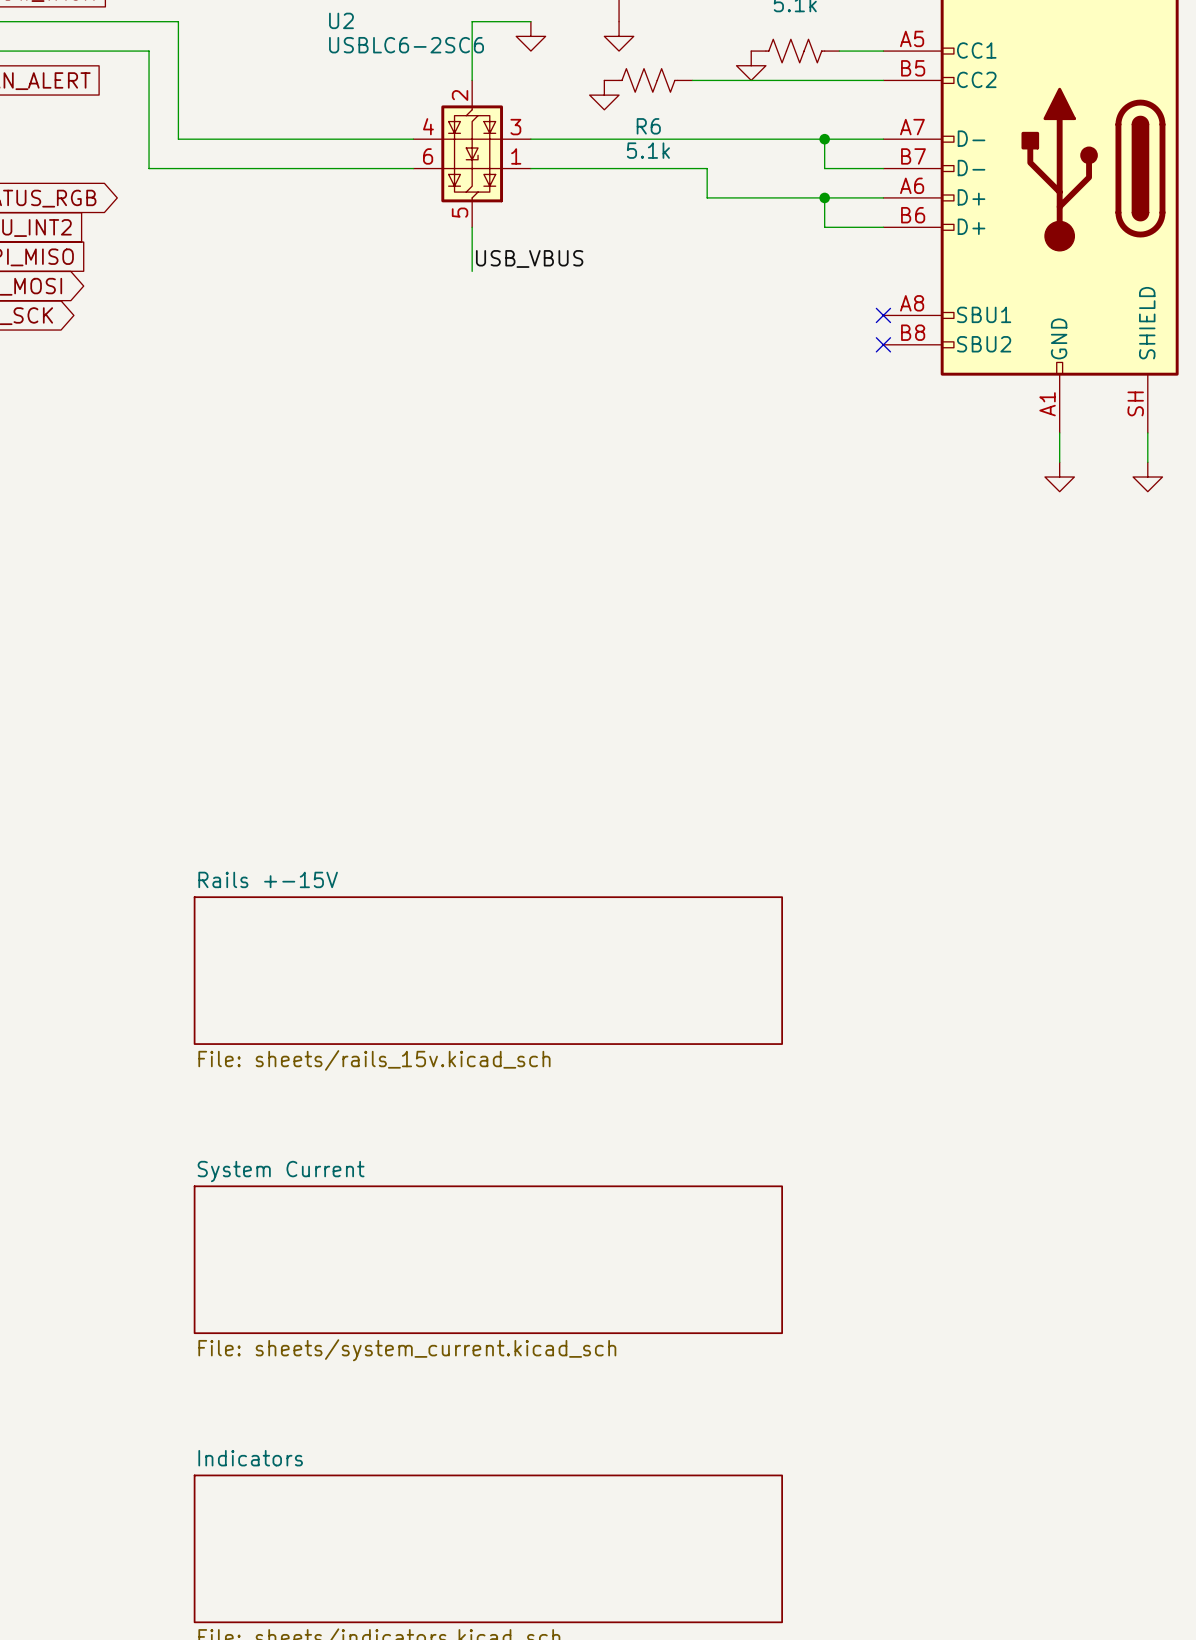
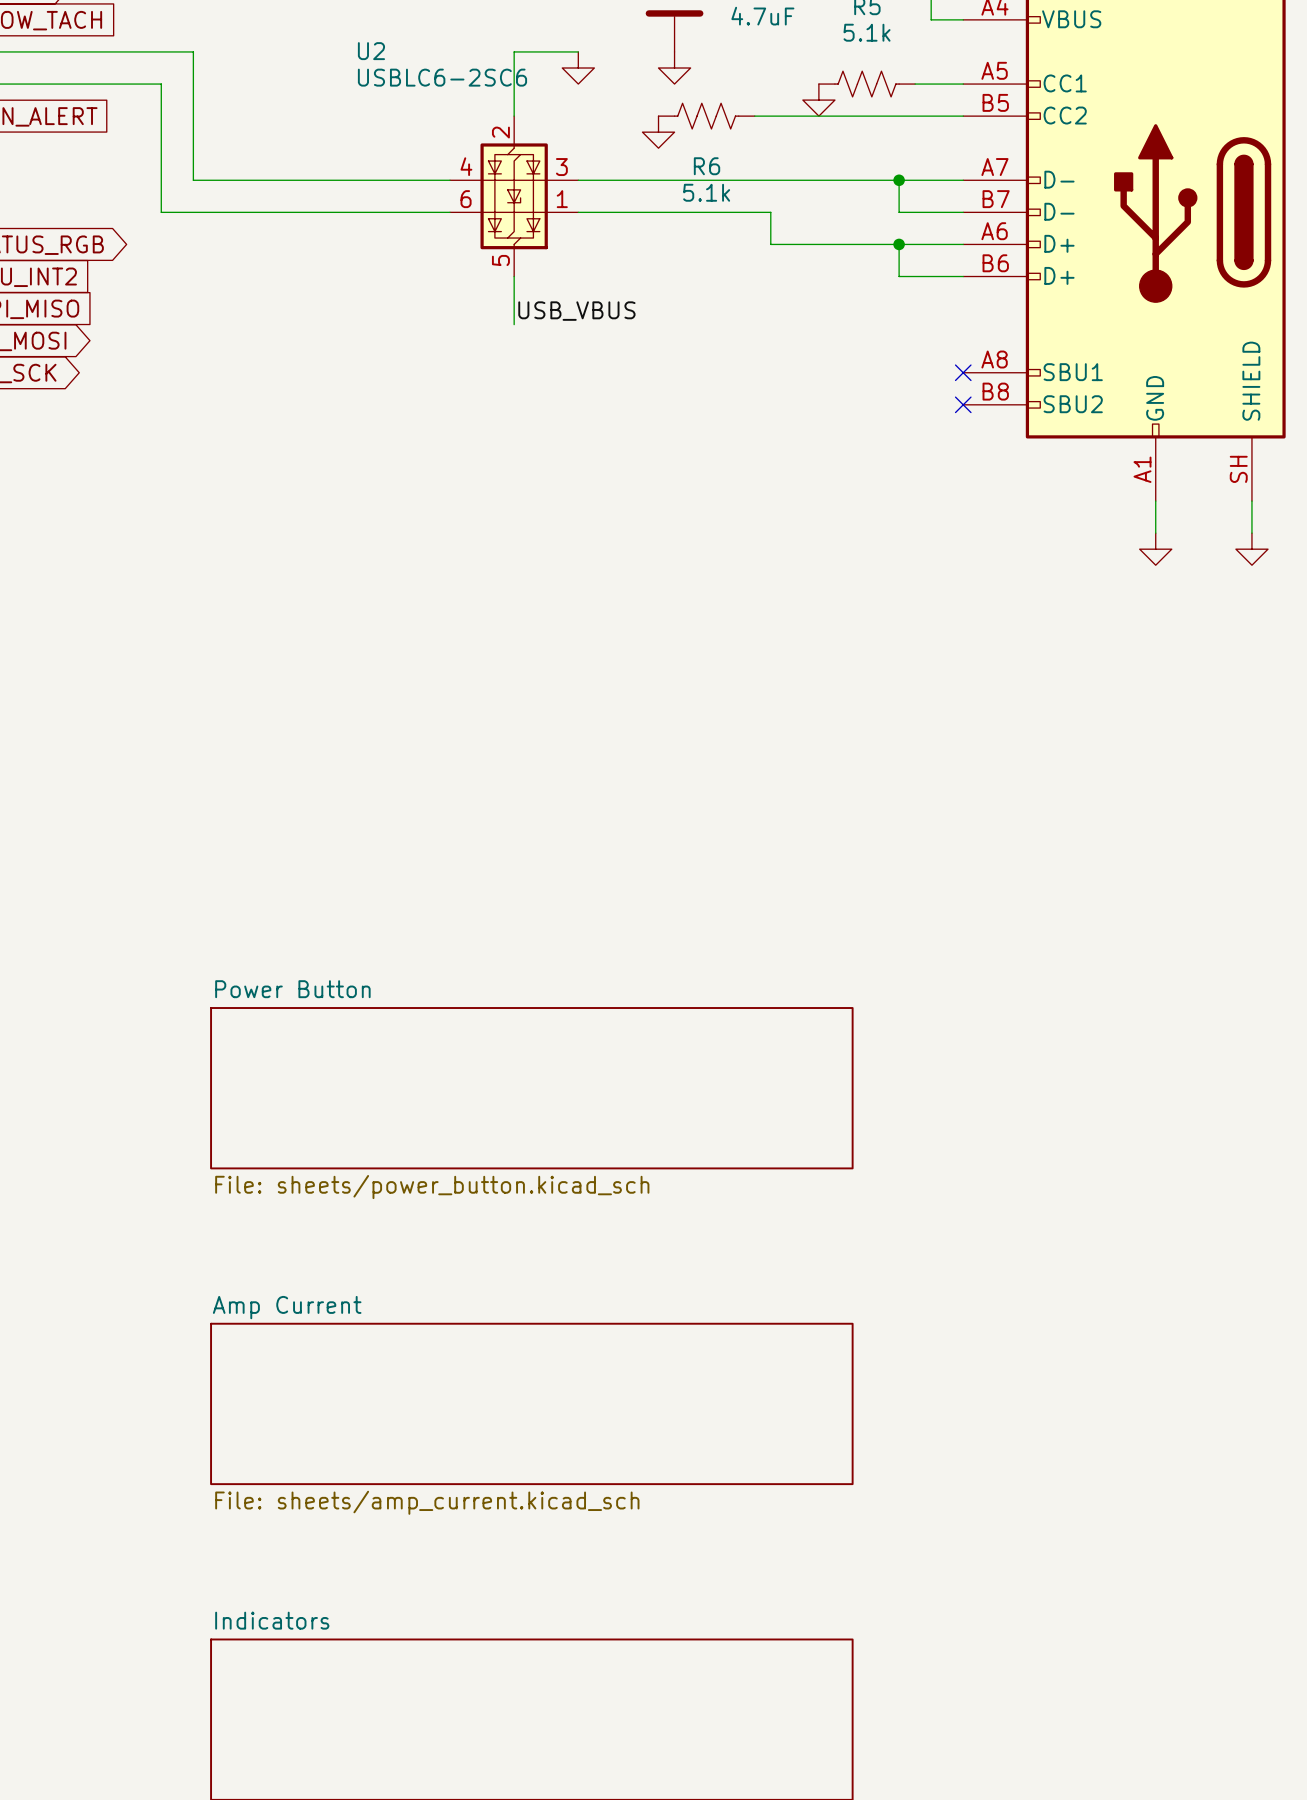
sheet Rails +-15V name: Rails +-15V (268, 879) -> Power Button (292, 989)
sheet Rails +-15V value: File: sheets/rails_15v.kicad_sch (374, 1060) -> File: sheets/power_button.kicad_sch (432, 1187)
sheet System Current name: System Current (281, 1171) -> Amp Current (287, 1307)
sheet System Current value: File: sheets/system_current.kicad_sch (407, 1350) -> File: sheets/amp_current.kicad_sch (427, 1502)

